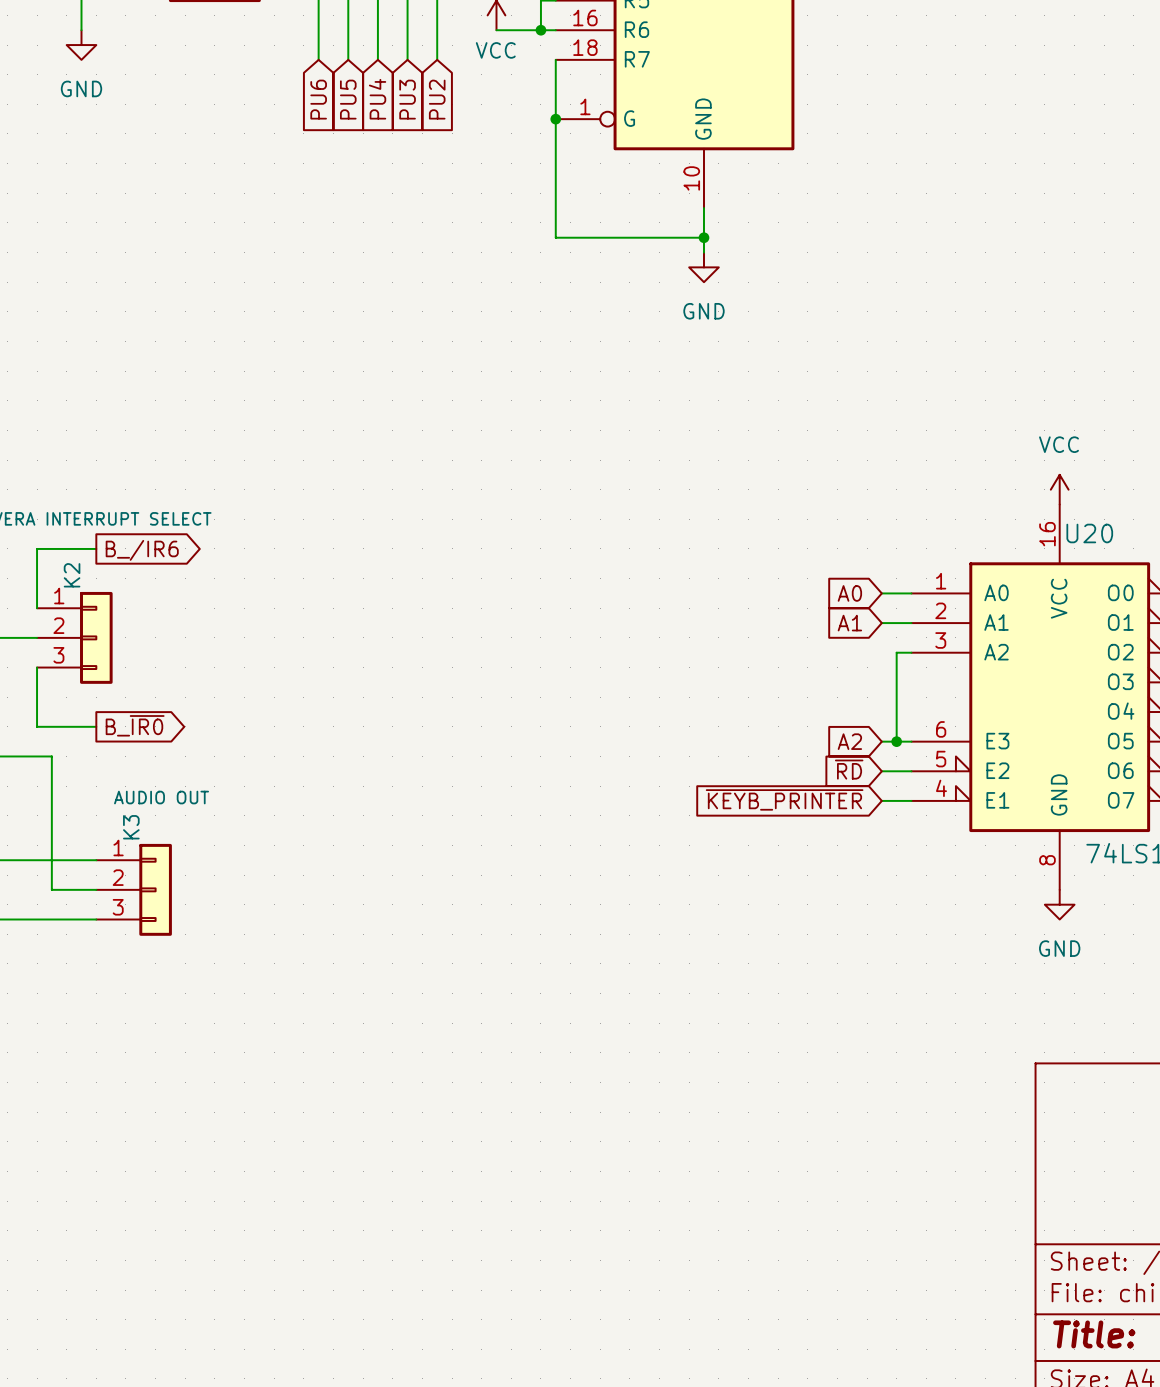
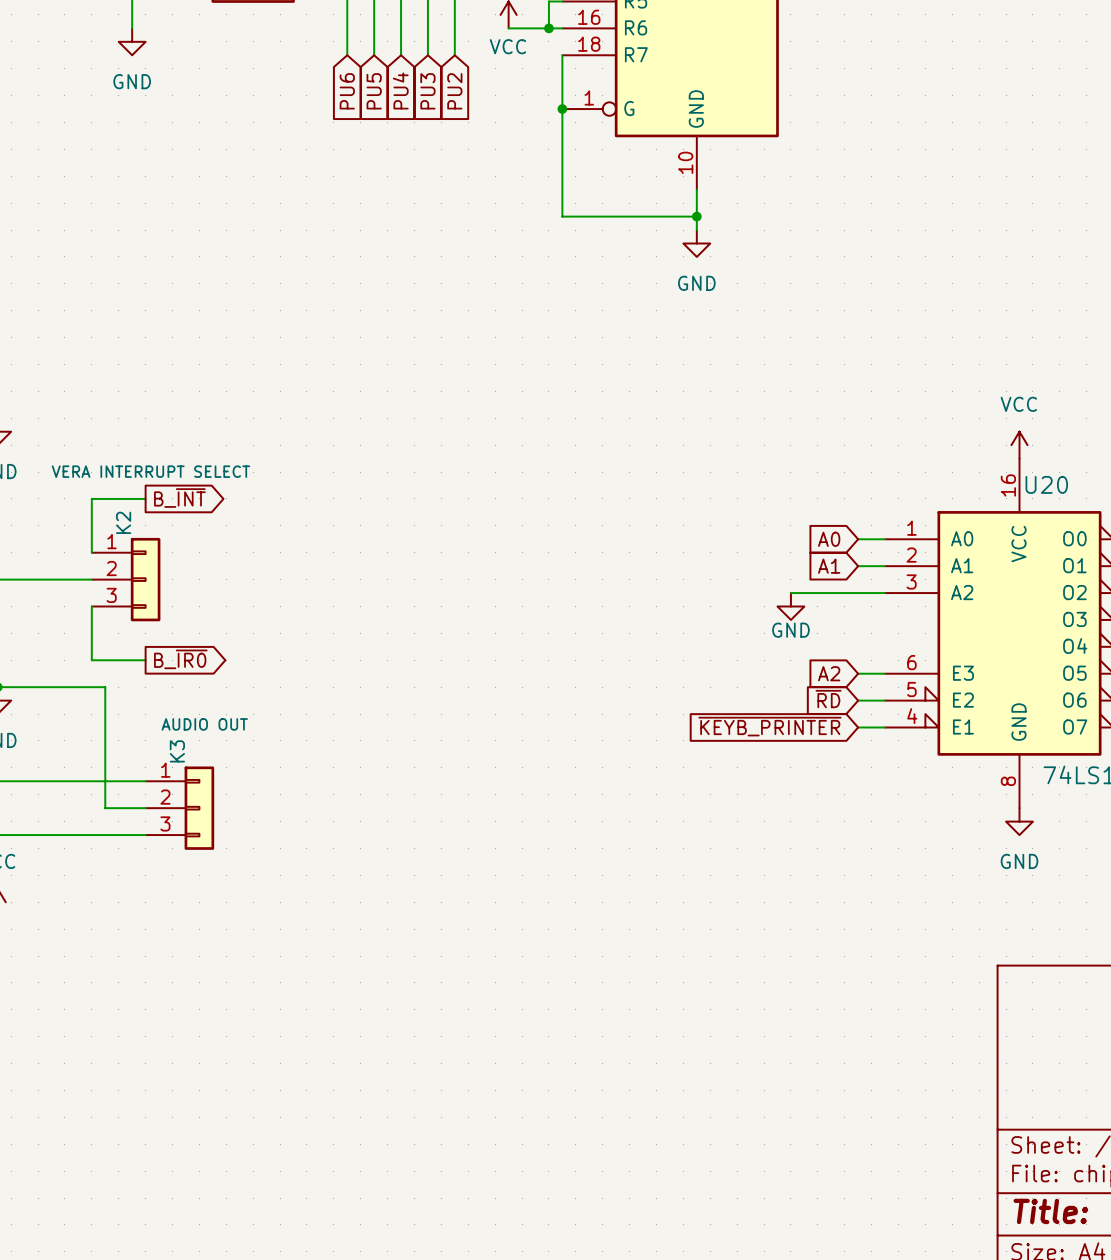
global label: B_/IR6 (142, 550) -> B_~{INT} (179, 498)
wire: (896, 652) (896, 741) -> (871, 593) (790, 593)
power symbol: none -> GND (790, 606)
junction: (896, 741) -> none

